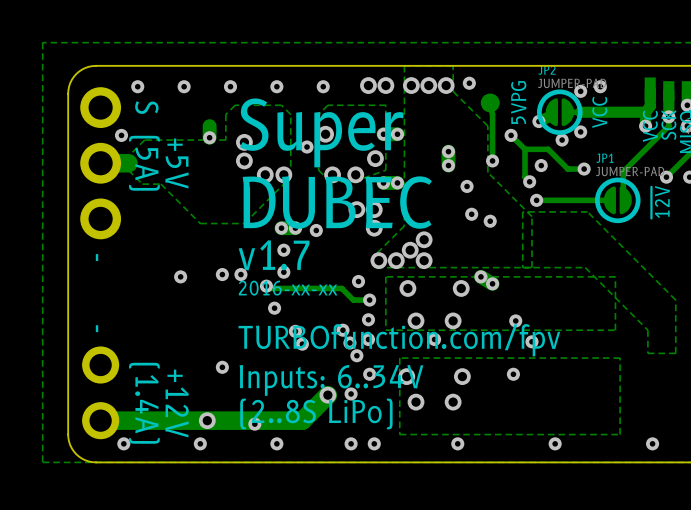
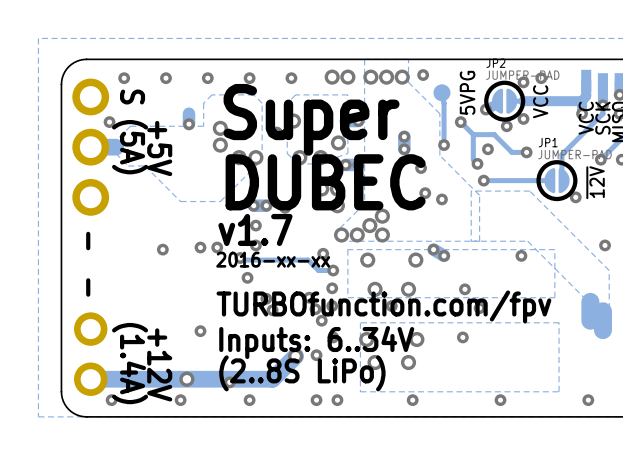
via: none -> (575, 197)
via: none -> (605, 245)
via: none -> (521, 255)
track: none -> (590, 301) (590, 320)
track: none -> (602, 311) (602, 330)

